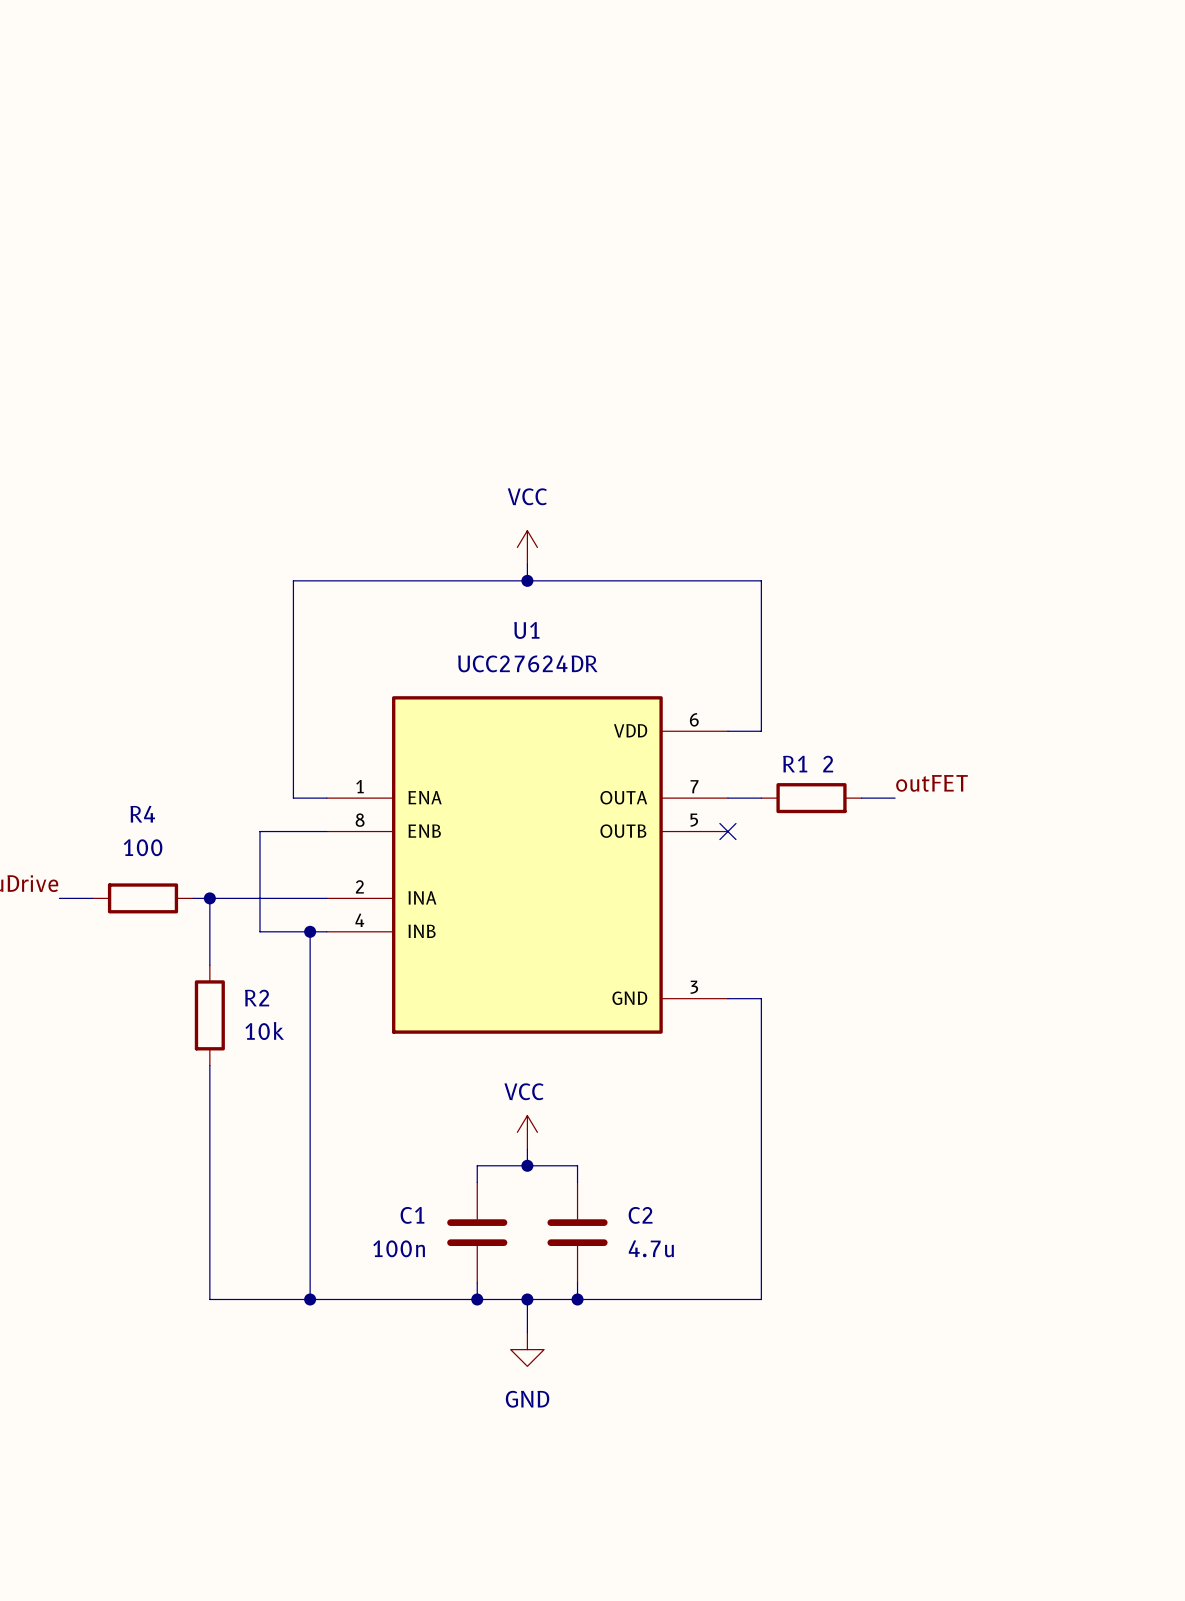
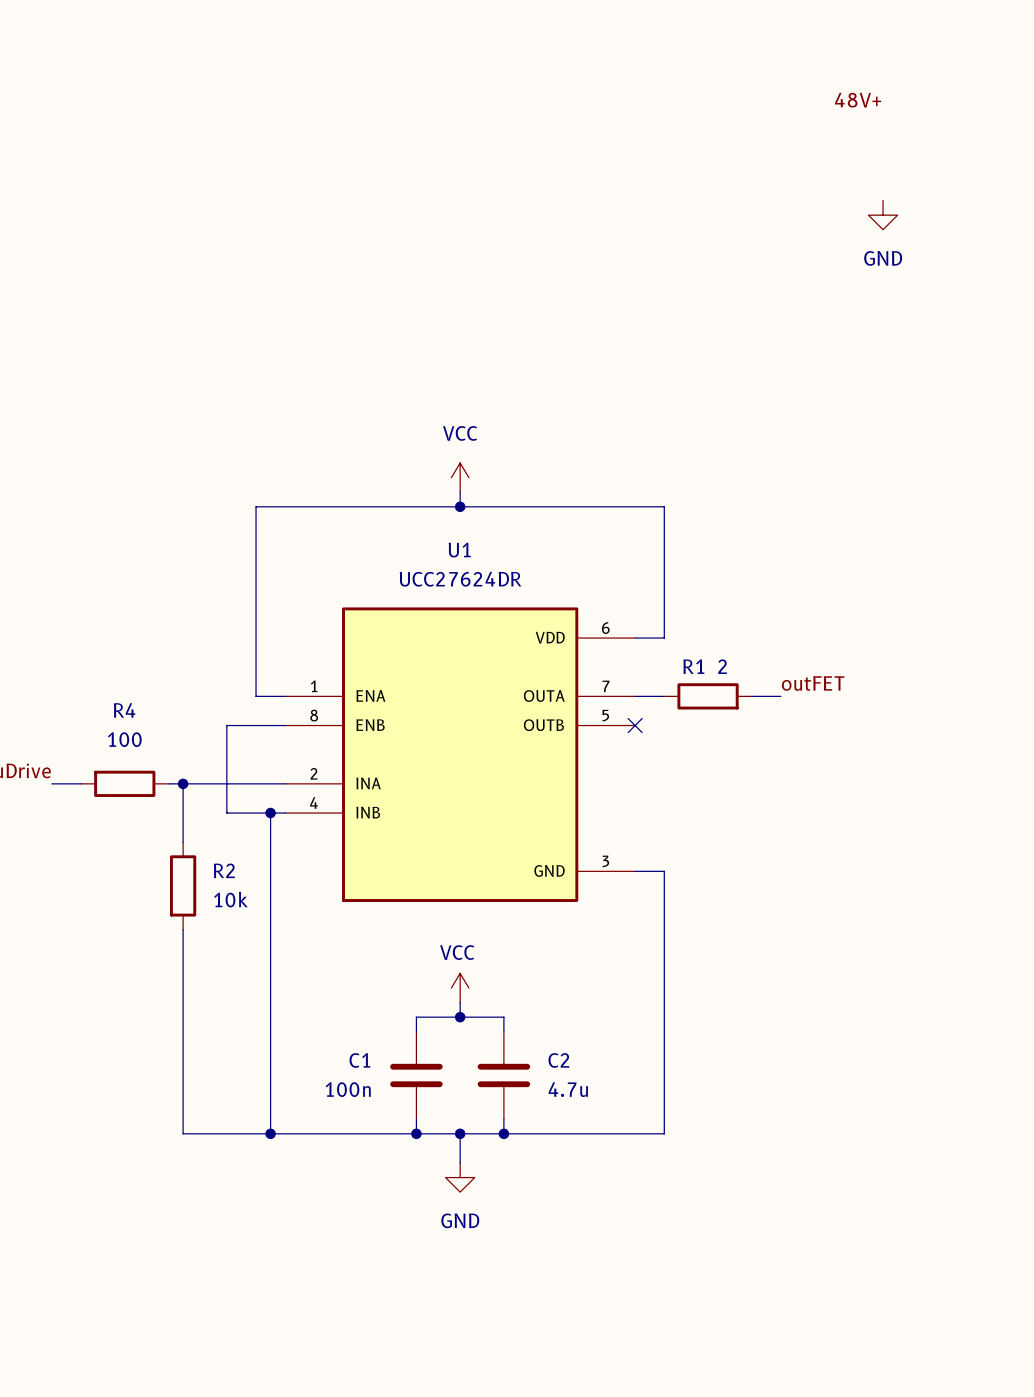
label: none -> 48V+ (858, 100)
power symbol: none -> GND (883, 215)

